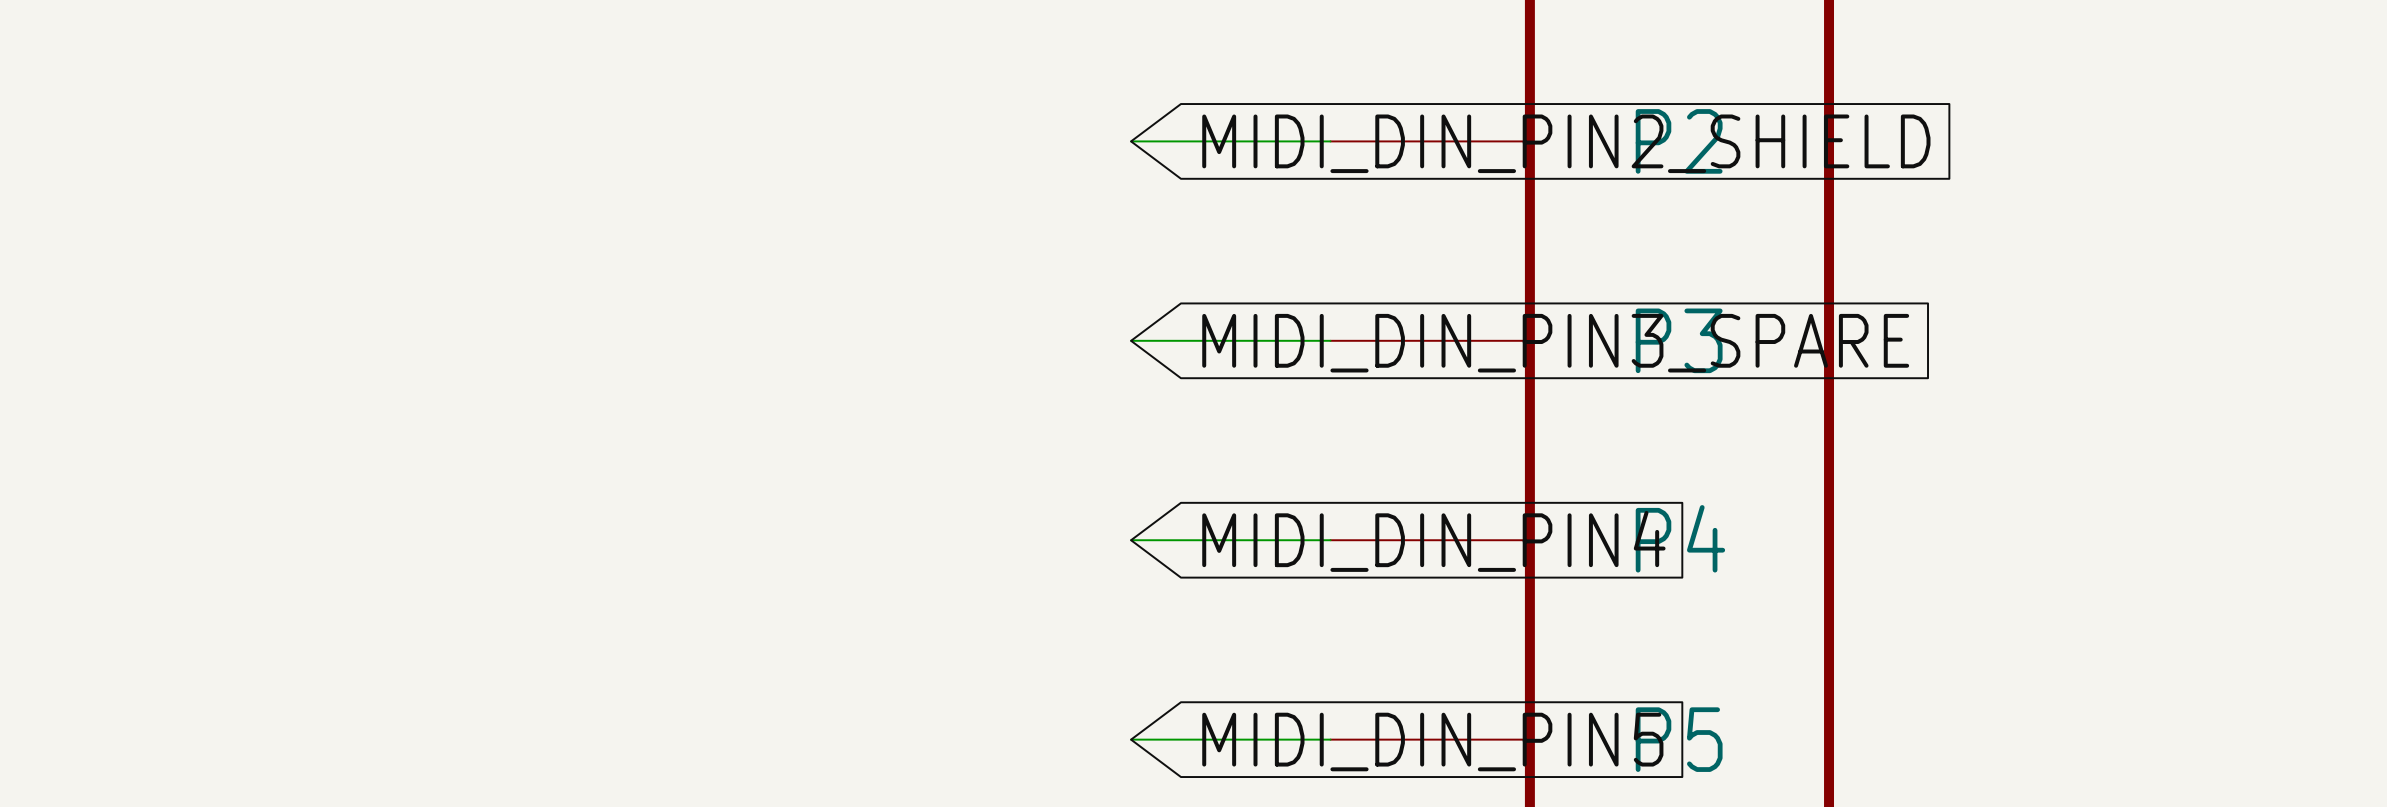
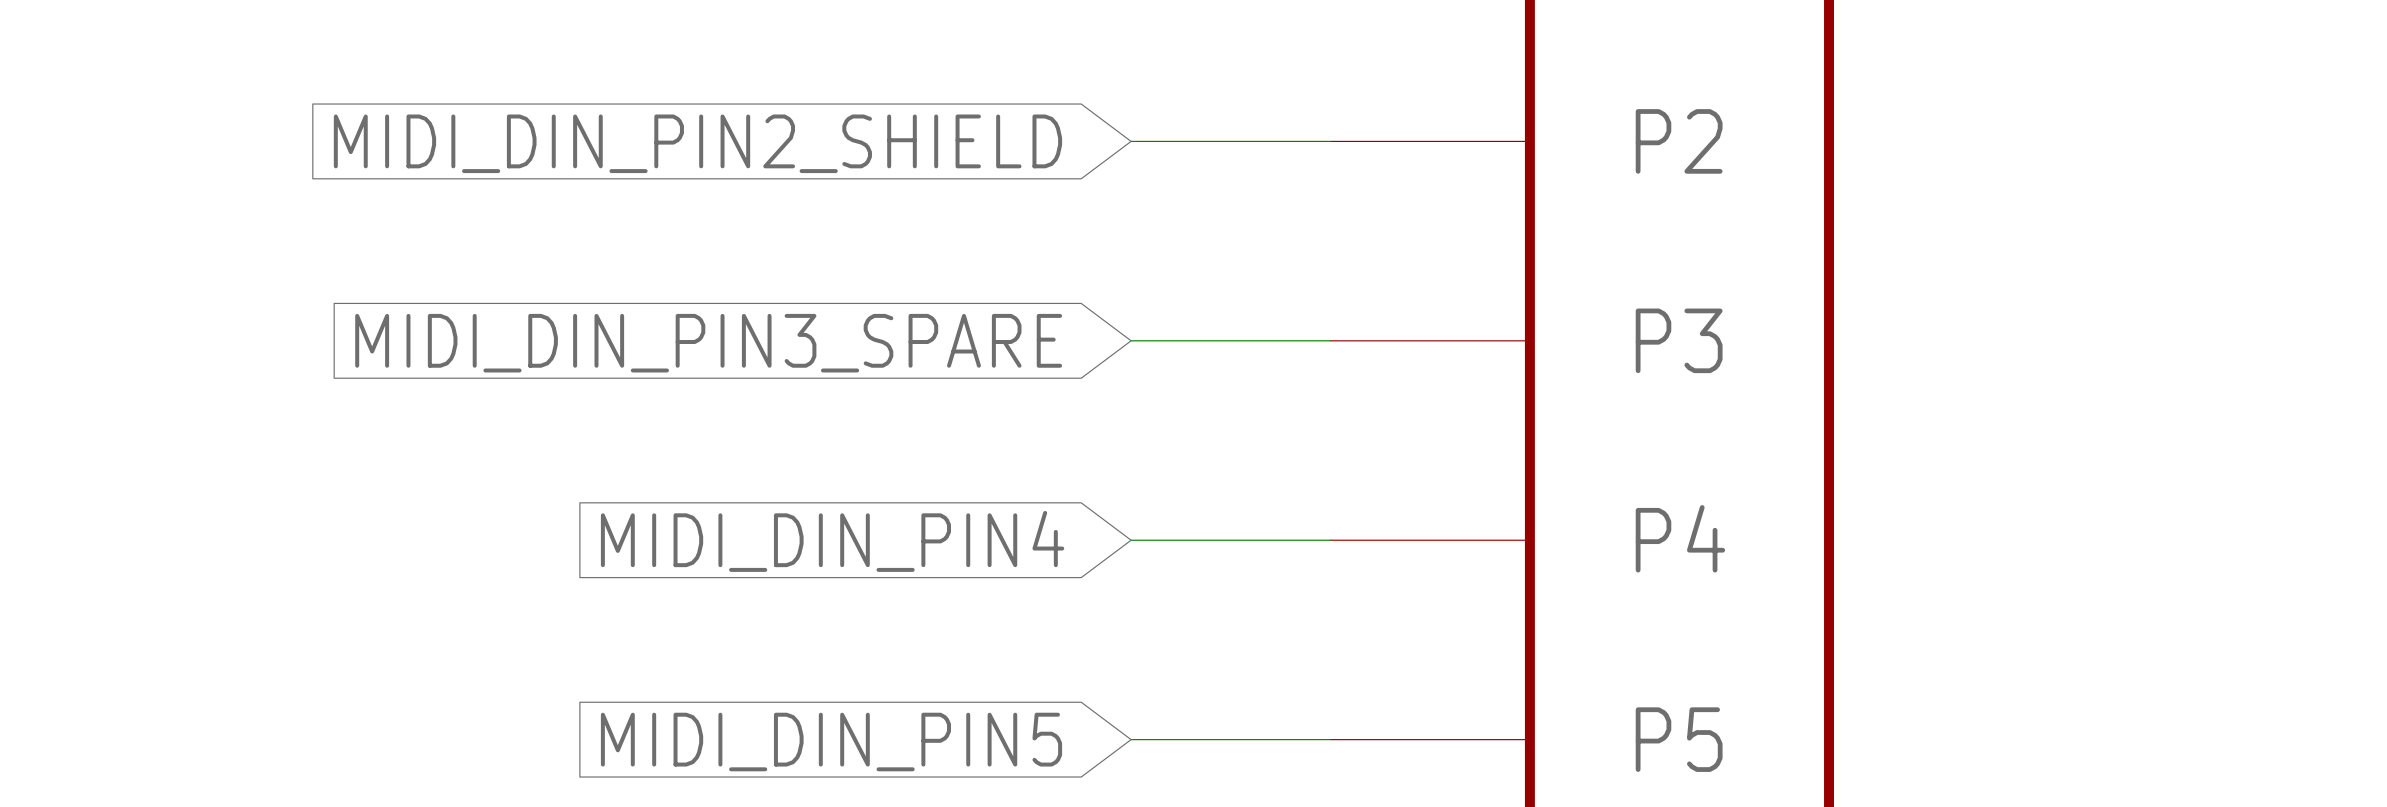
global label rotation: 0° (1566, 143) -> 180° (697, 143)
global label rotation: 0° (1555, 343) -> 180° (708, 343)
global label position: MIDI_DIN_PIN3_SPARE (1555, 343) -> MIDI_DIN_PIN3_SPARE (708, 343)
global label rotation: 0° (1433, 541) -> 180° (832, 541)
global label rotation: 0° (1432, 742) -> 180° (831, 742)

